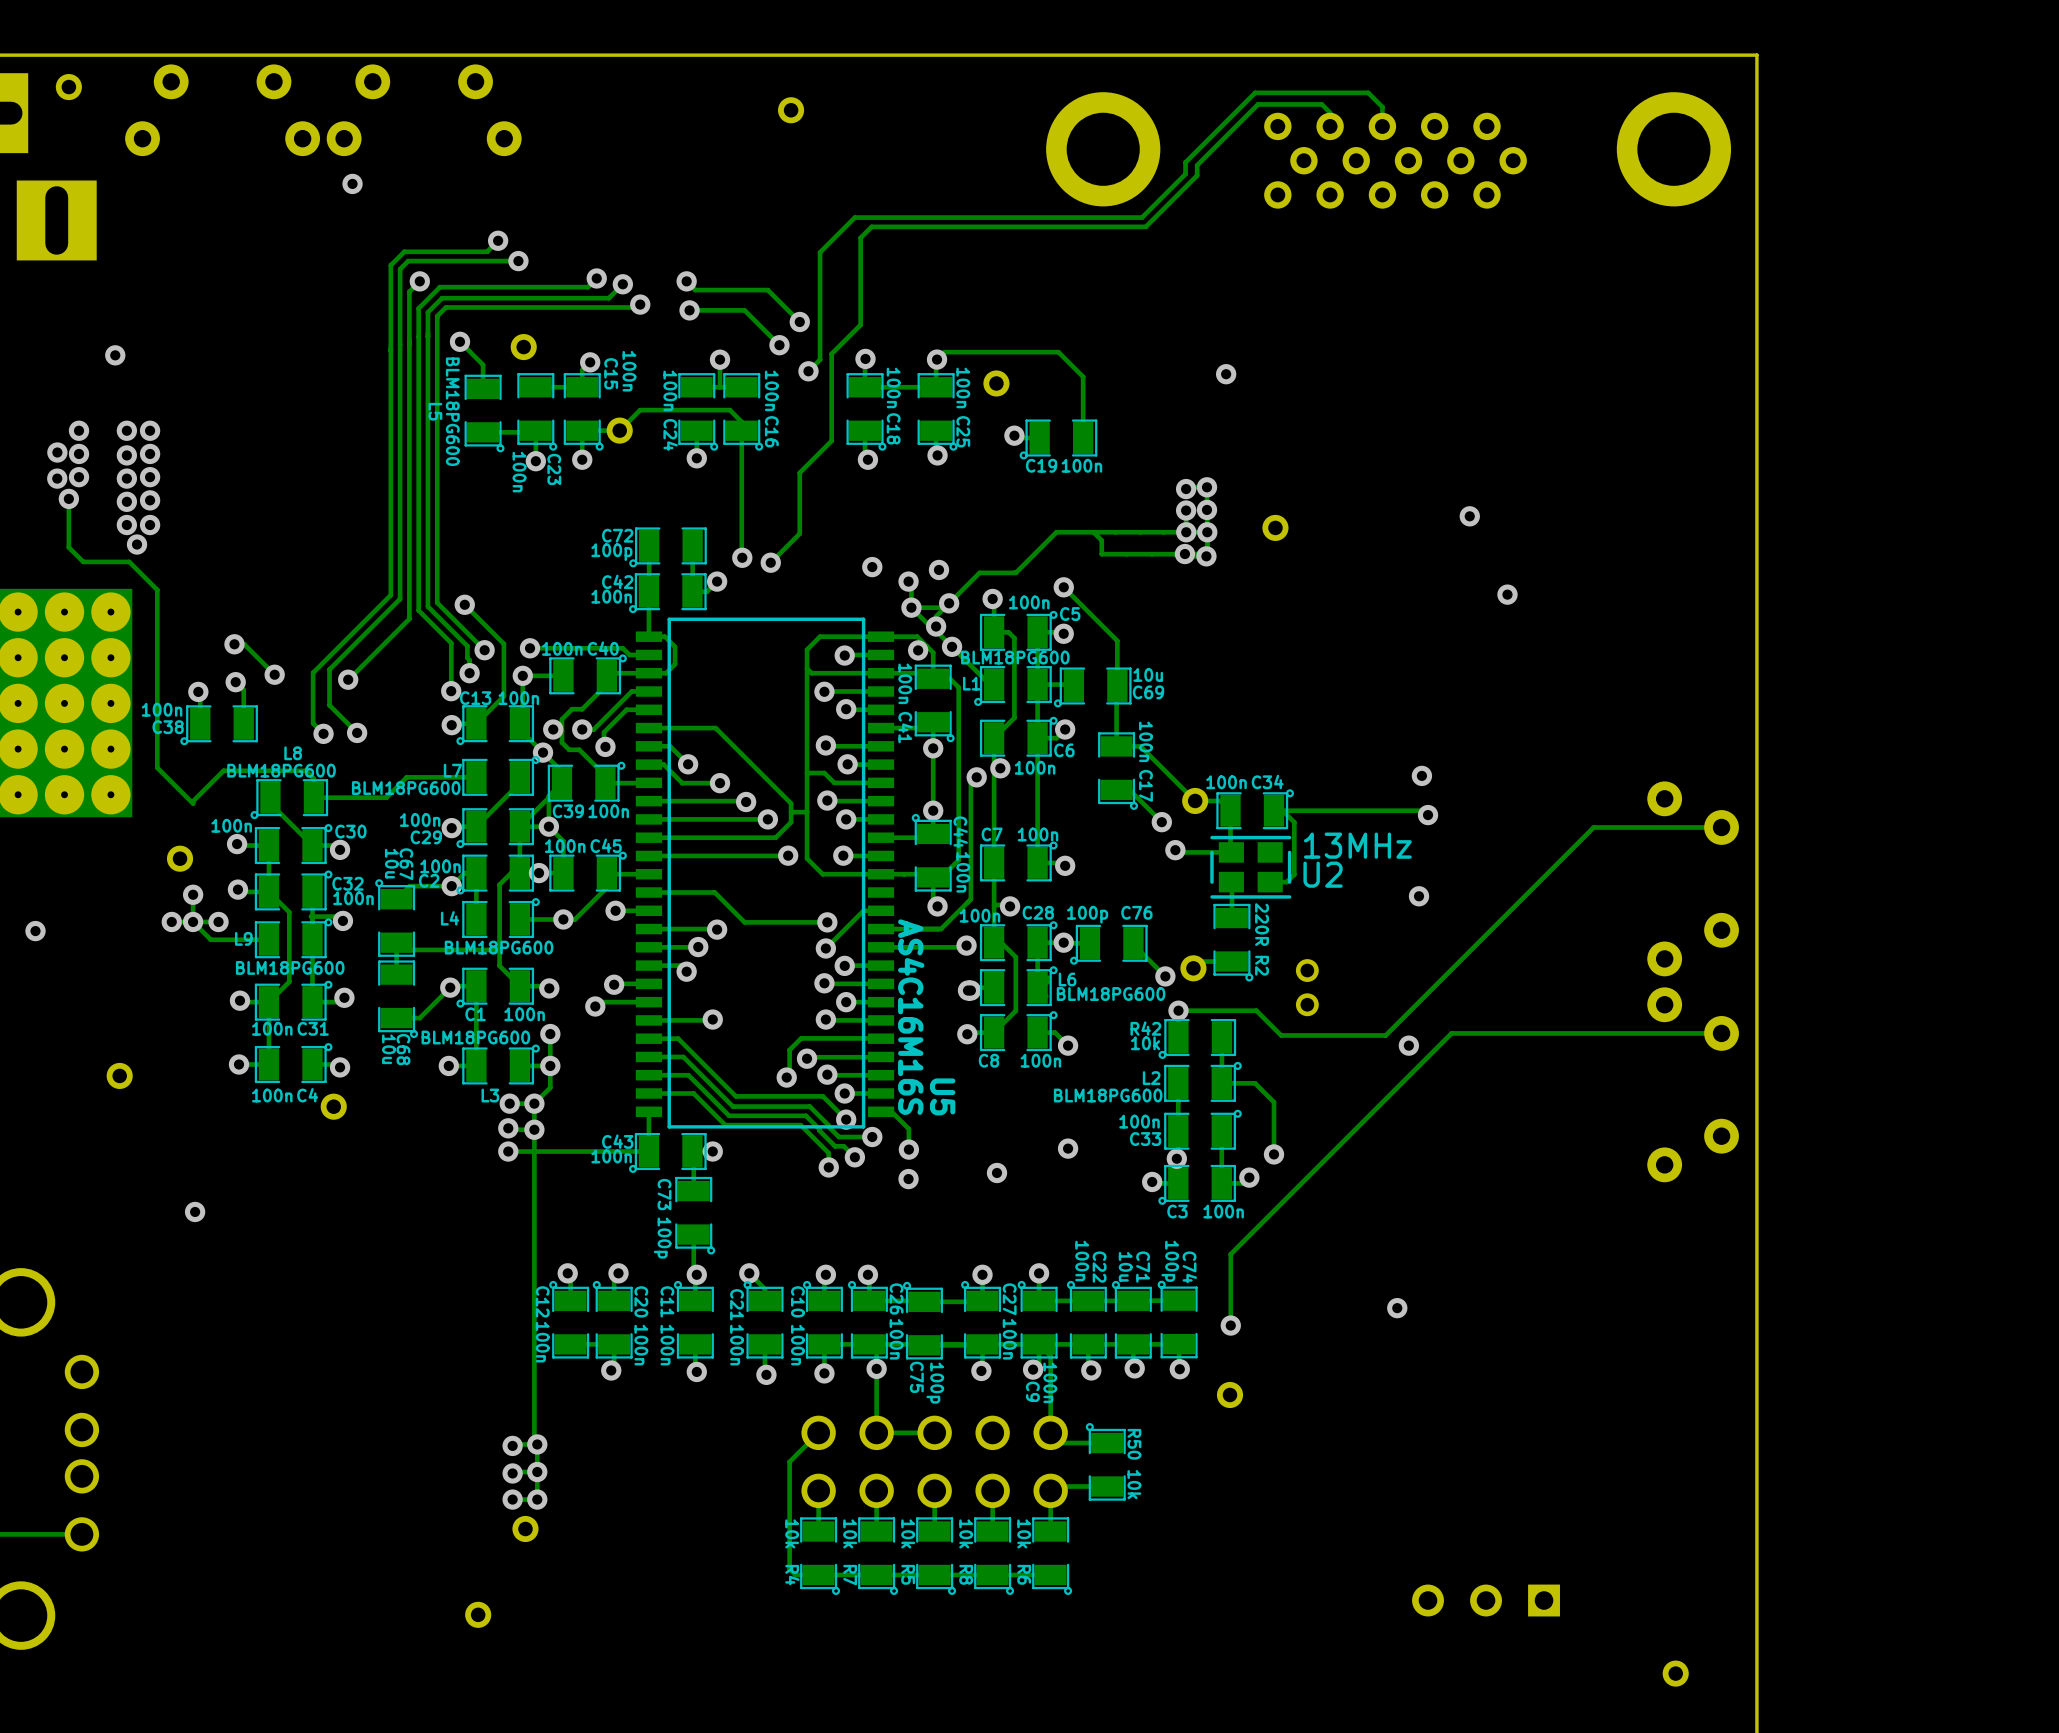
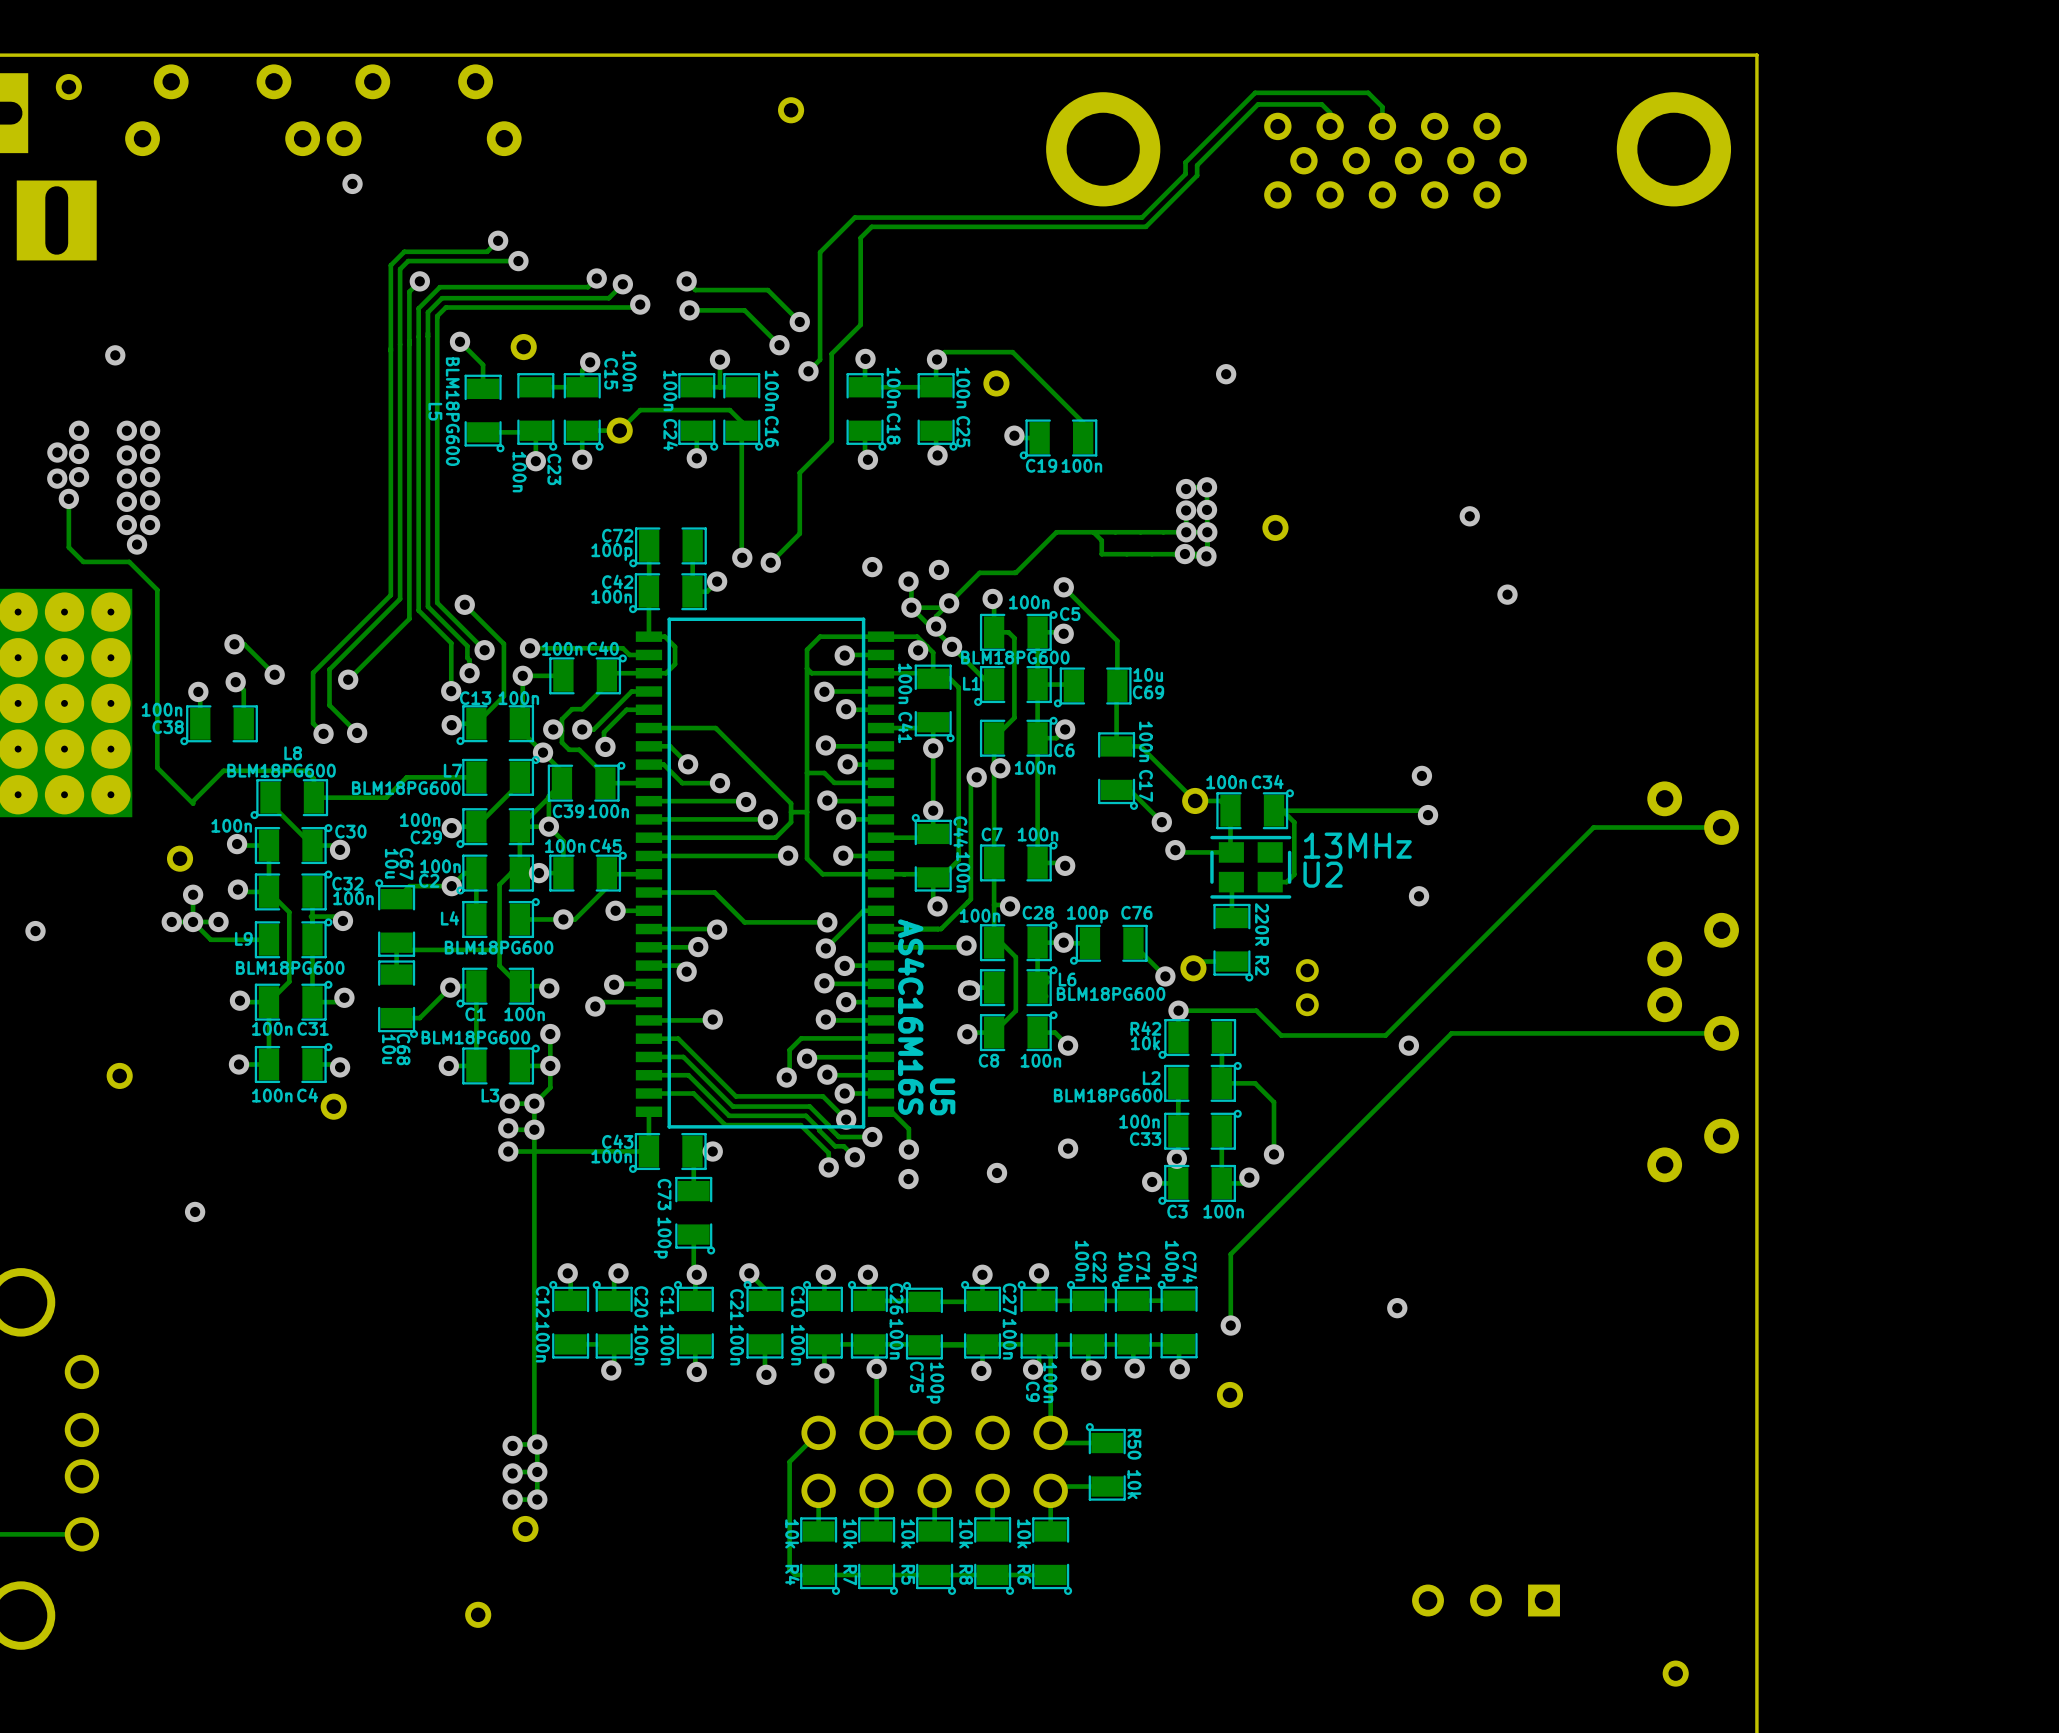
track: (1012, 352) (1058, 352) (1083, 376) (1083, 422) -> (1012, 352) (1083, 422)

